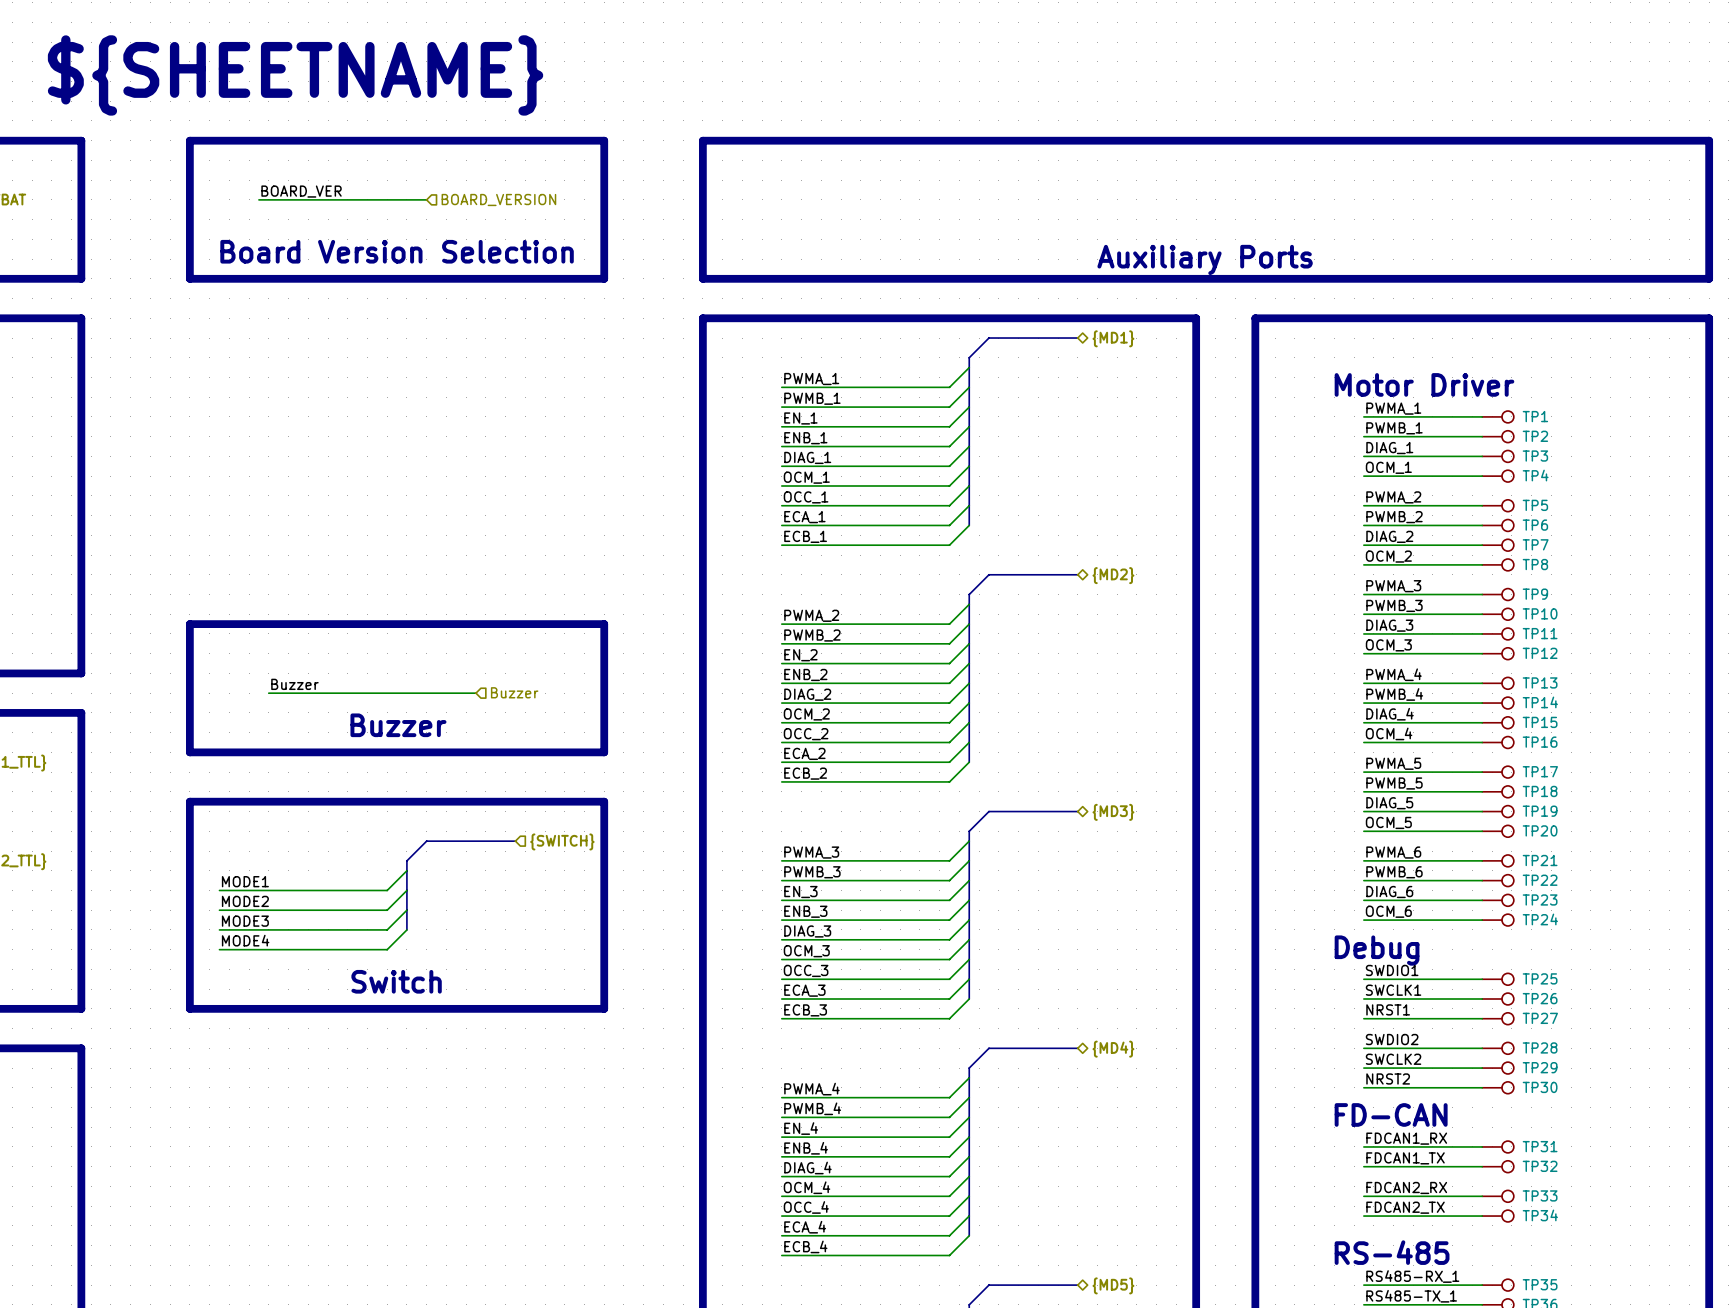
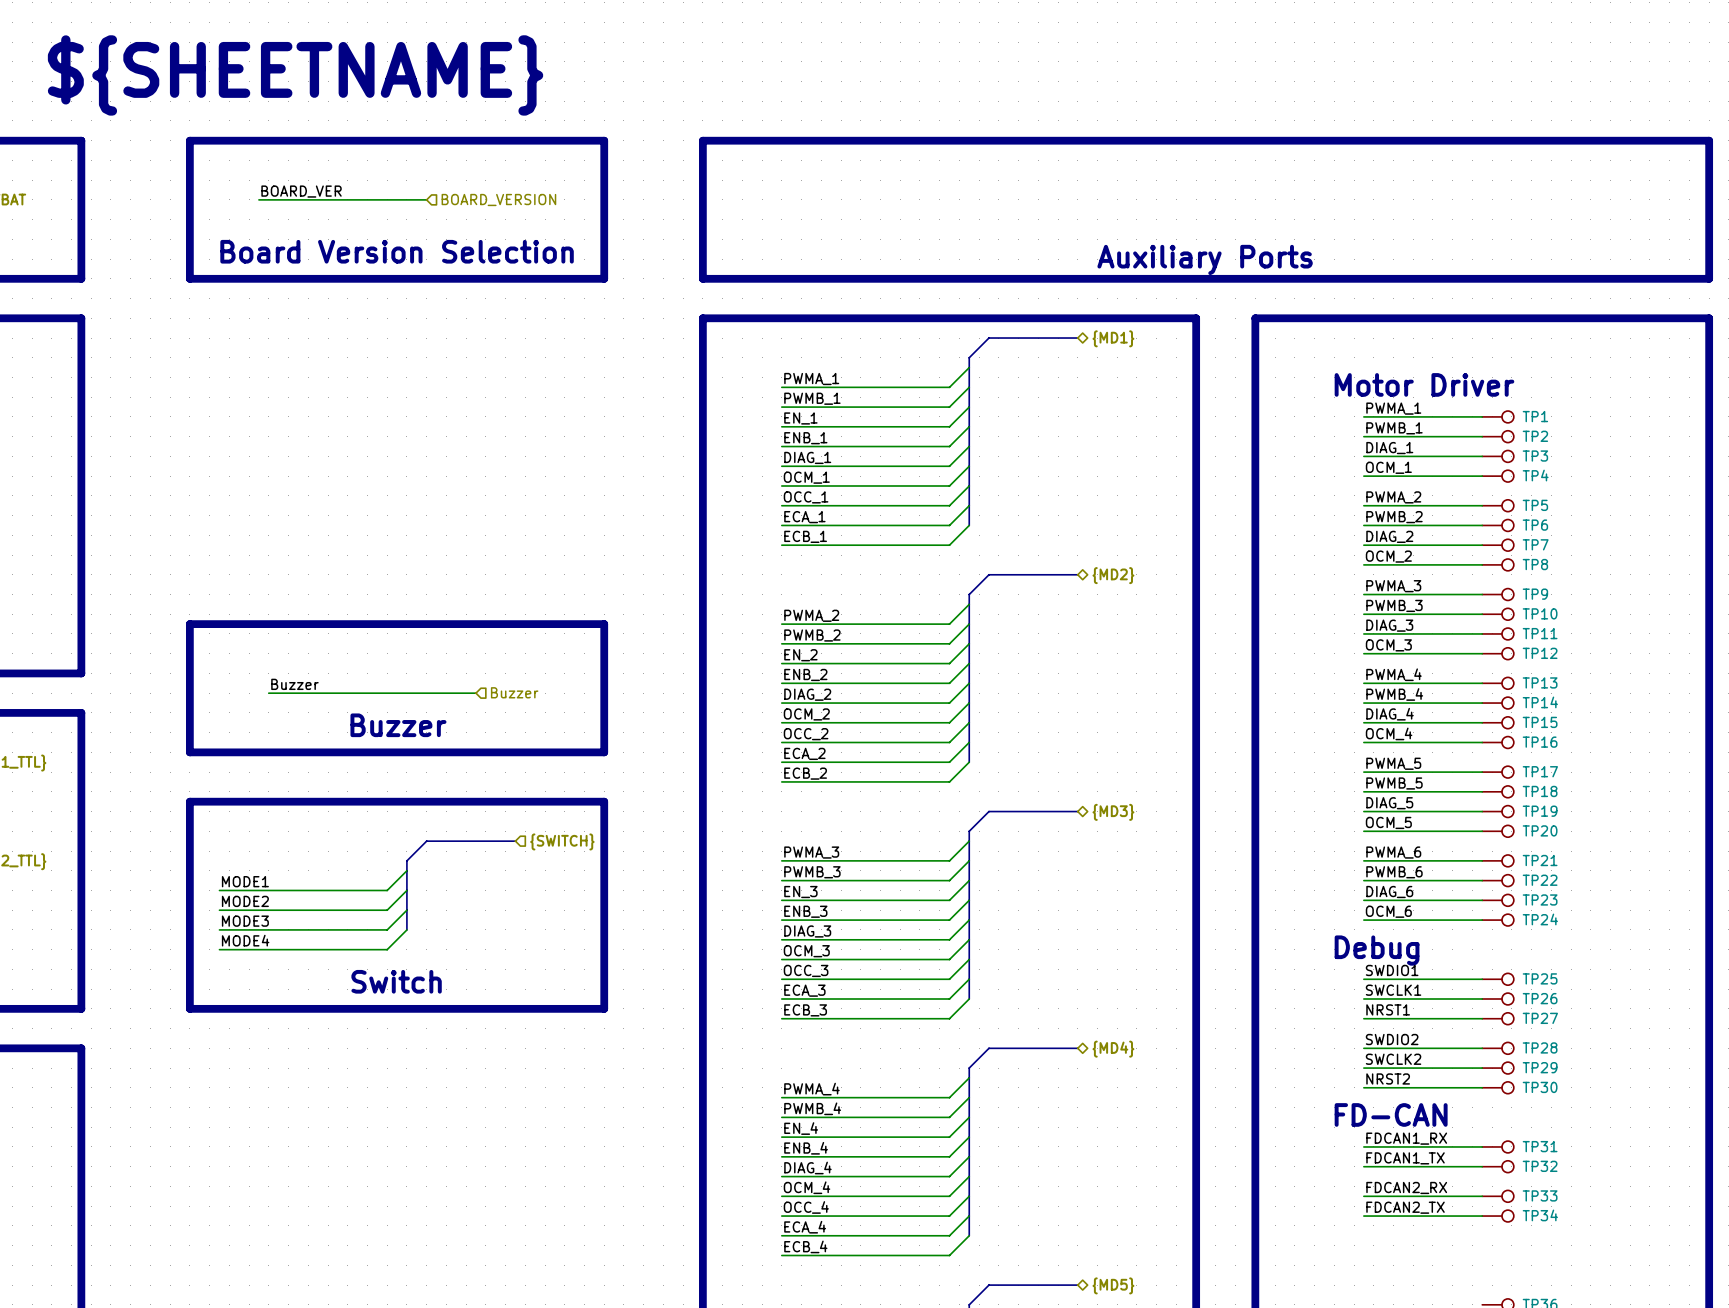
text: RS-485 (1392, 1252) -> none
label: RS485-RX_1 (1412, 1276) -> none
wire: (1363, 1285) (1482, 1285) -> none
TP35: (1498, 1285) -> none
label: RS485-TX_1 (1411, 1296) -> none
wire: (1363, 1304) (1482, 1304) -> none

